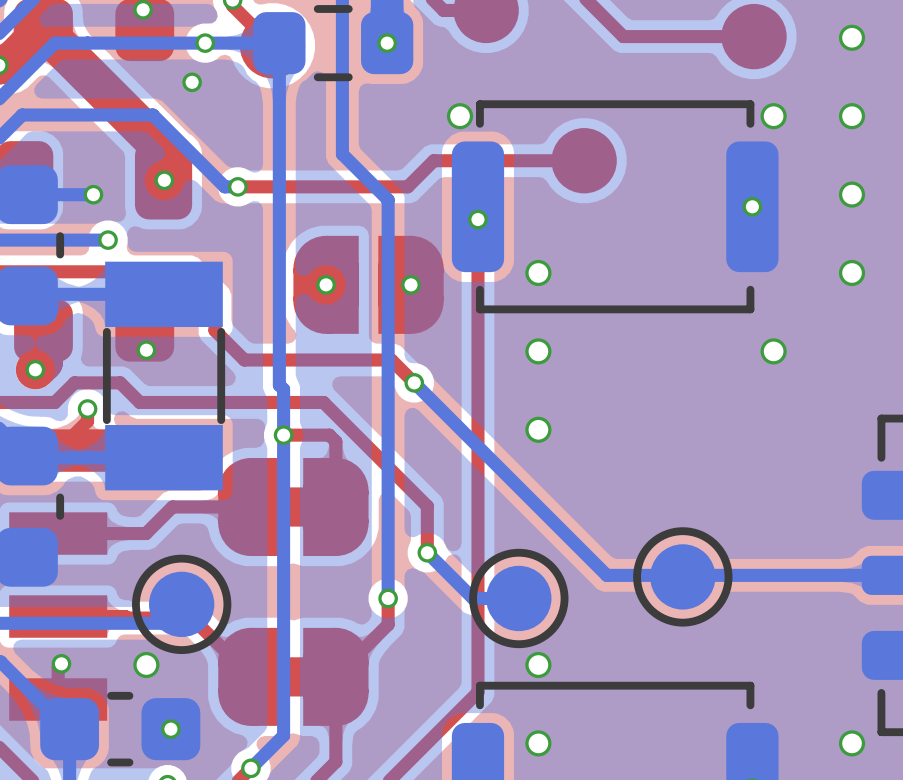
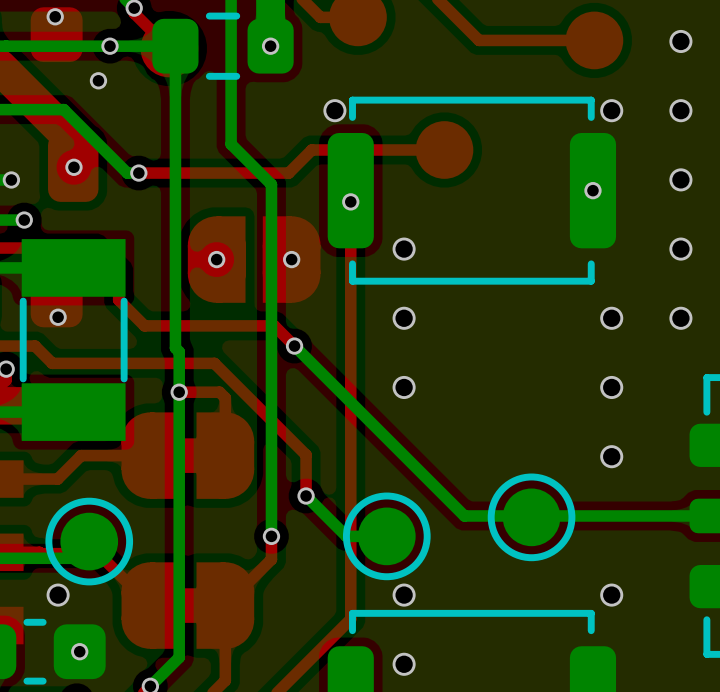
via: none -> (680, 318)
via: none -> (611, 387)
via: none -> (611, 456)
via: none -> (611, 595)
via: (852, 743) -> none

